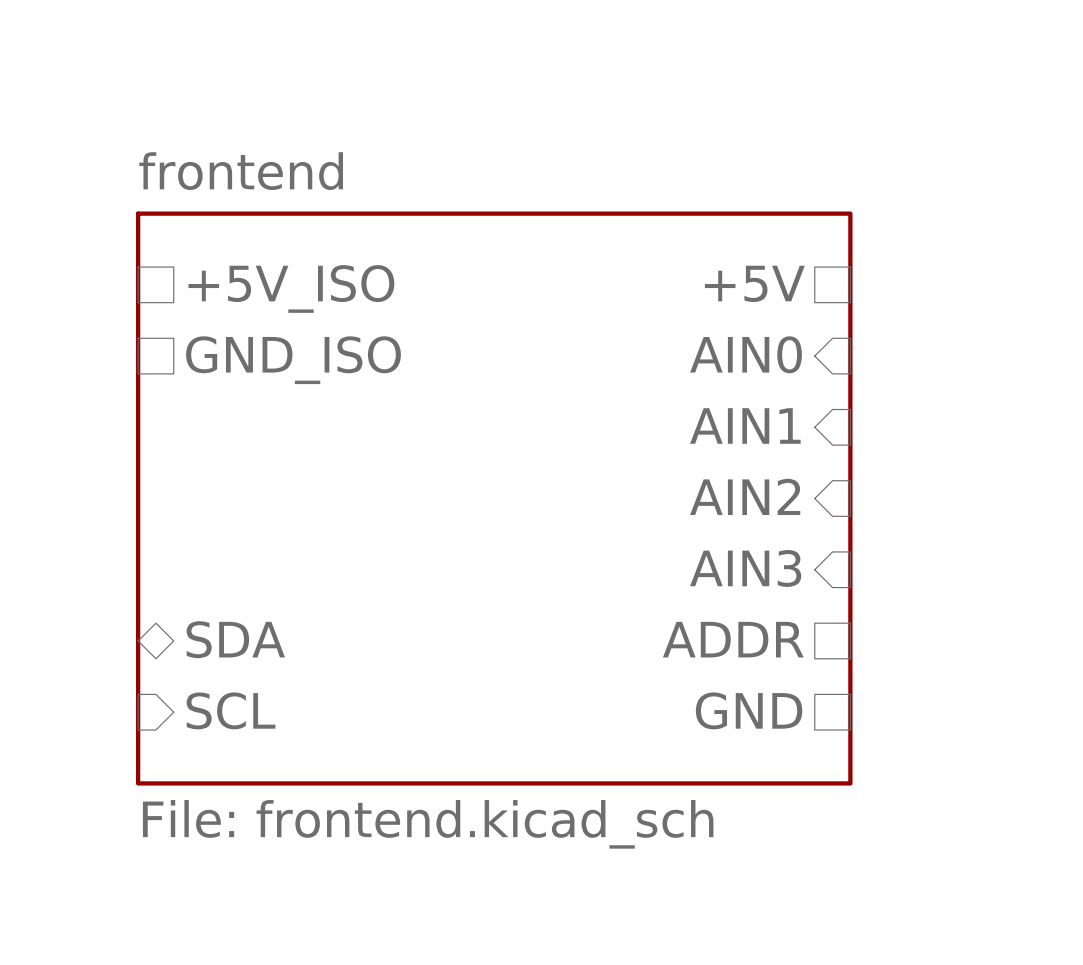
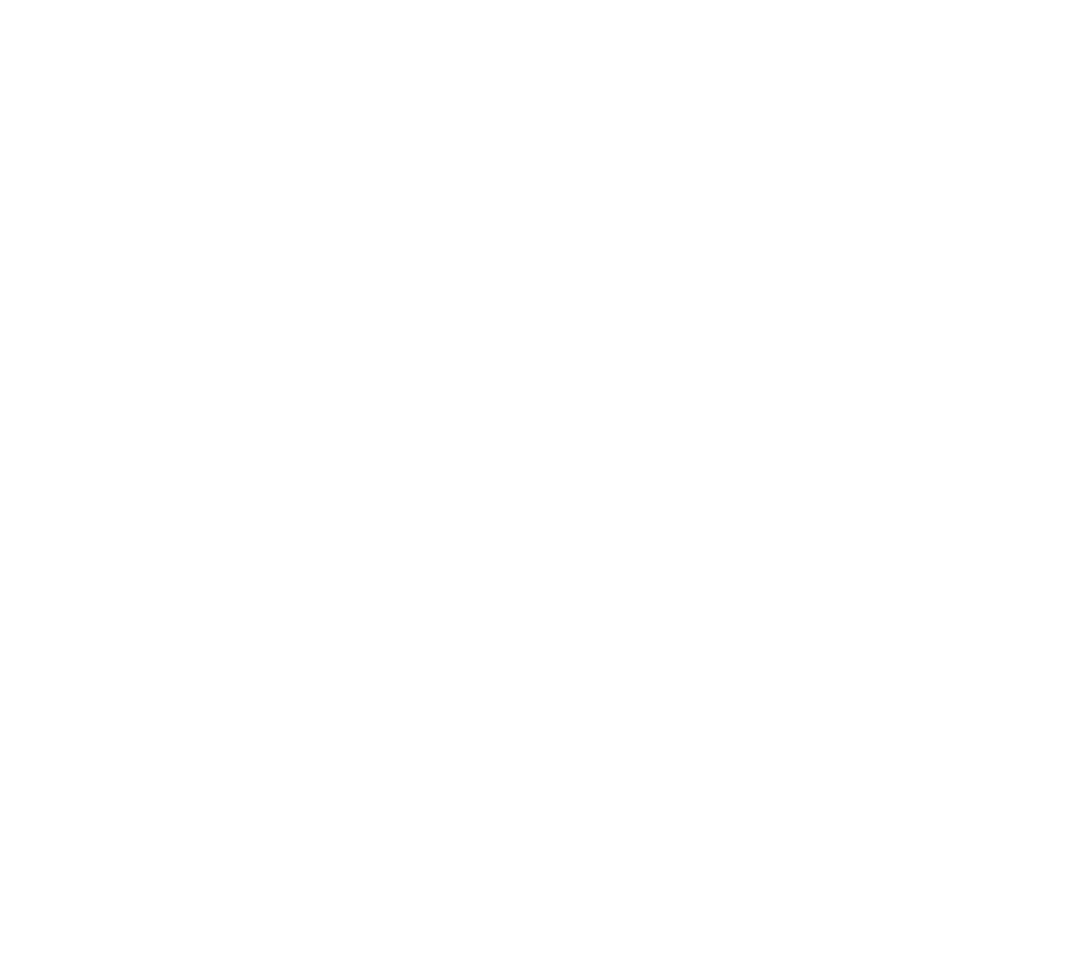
sheet pin: +5V (754, 283) -> none
sheet pin: +5V_ISO (291, 288) -> none
sheet pin: AIN0 (746, 354) -> none
sheet pin: GND_ISO (293, 360) -> none
sheet pin: AIN1 (745, 425) -> none
sheet pin: AIN2 (745, 496) -> none
sheet frontend: File: frontend.kicad_sch (494, 498) -> none
sheet pin: AIN3 (745, 568) -> none
sheet pin: SDA (235, 639) -> none
sheet pin: ADDR (733, 639) -> none
sheet pin: SCL (231, 710) -> none
sheet pin: GND (749, 710) -> none

